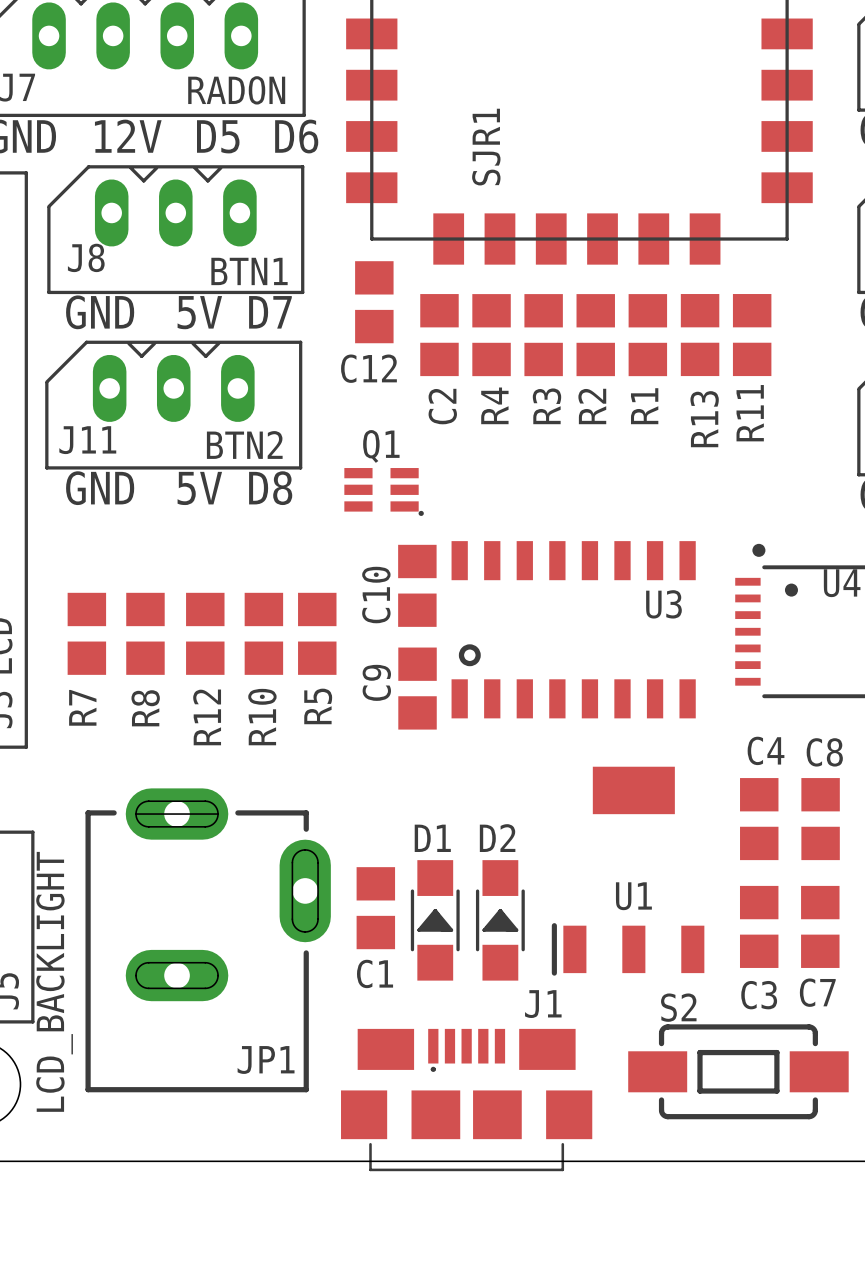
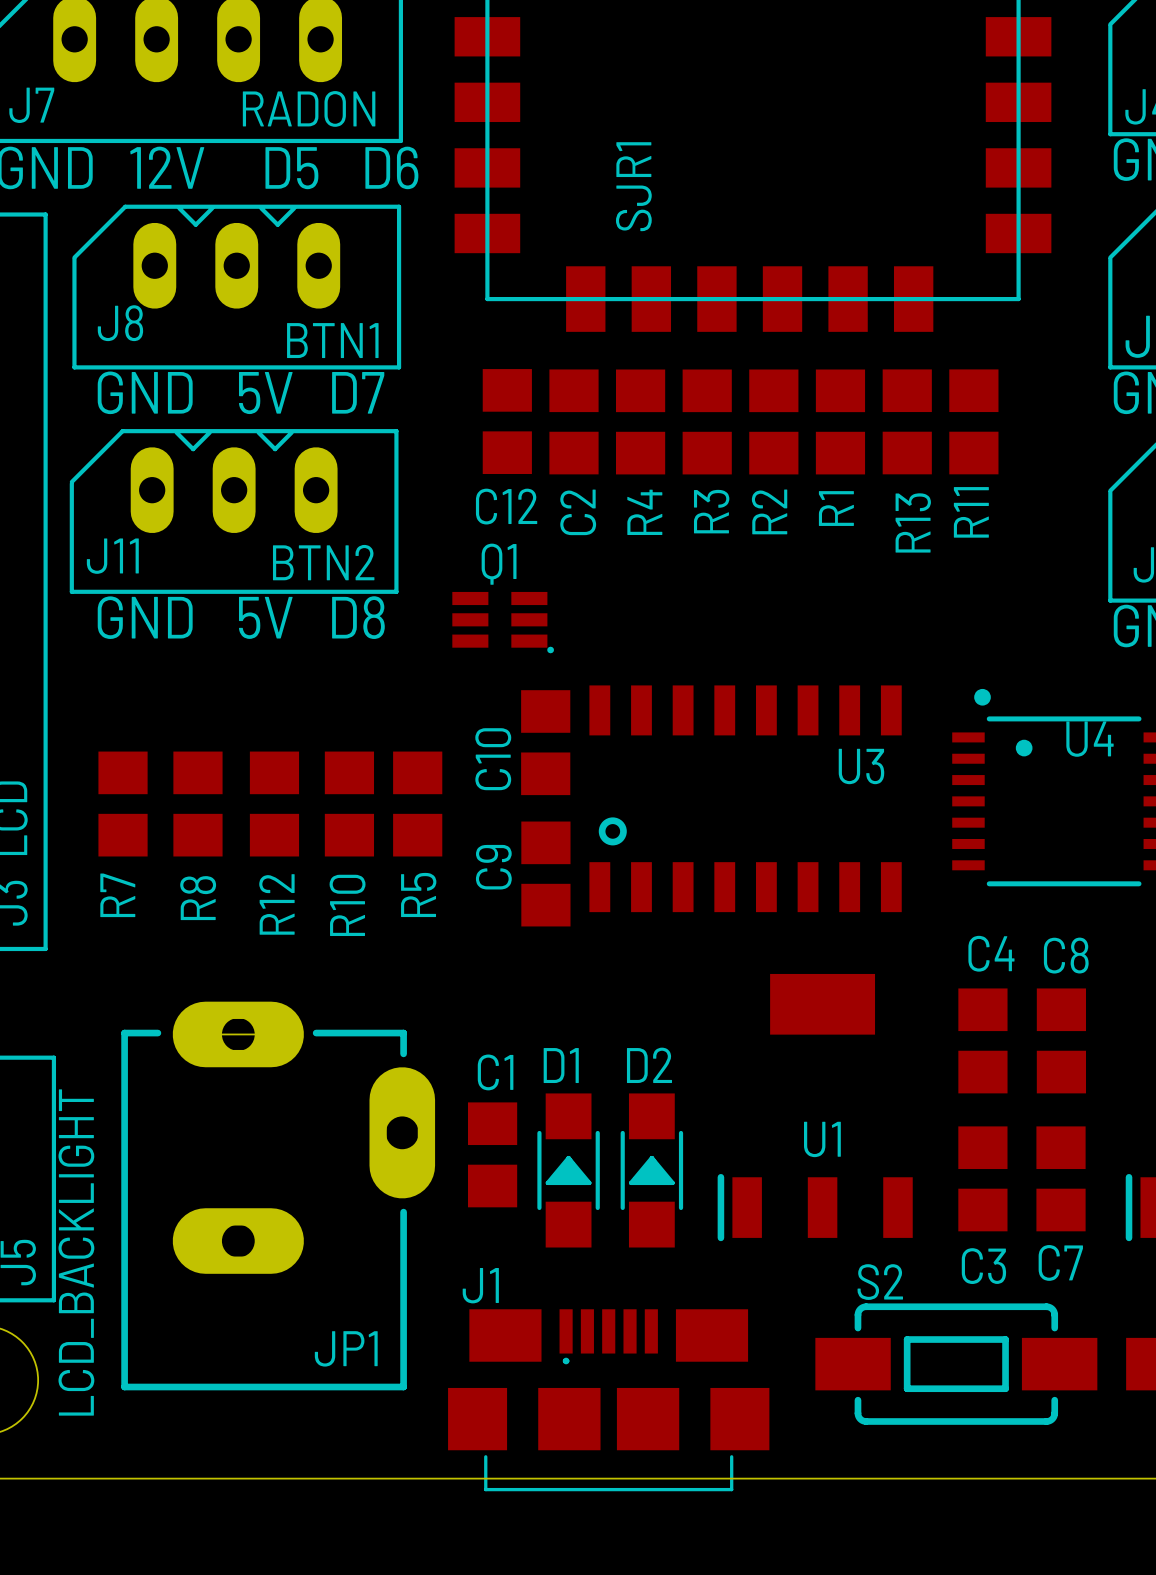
C12 position: (374, 302) -> (507, 421)
C1 name position: C1 (375, 973) -> C1 (495, 1072)
J1 name position: J1 (543, 1004) -> J1 (480, 1285)

